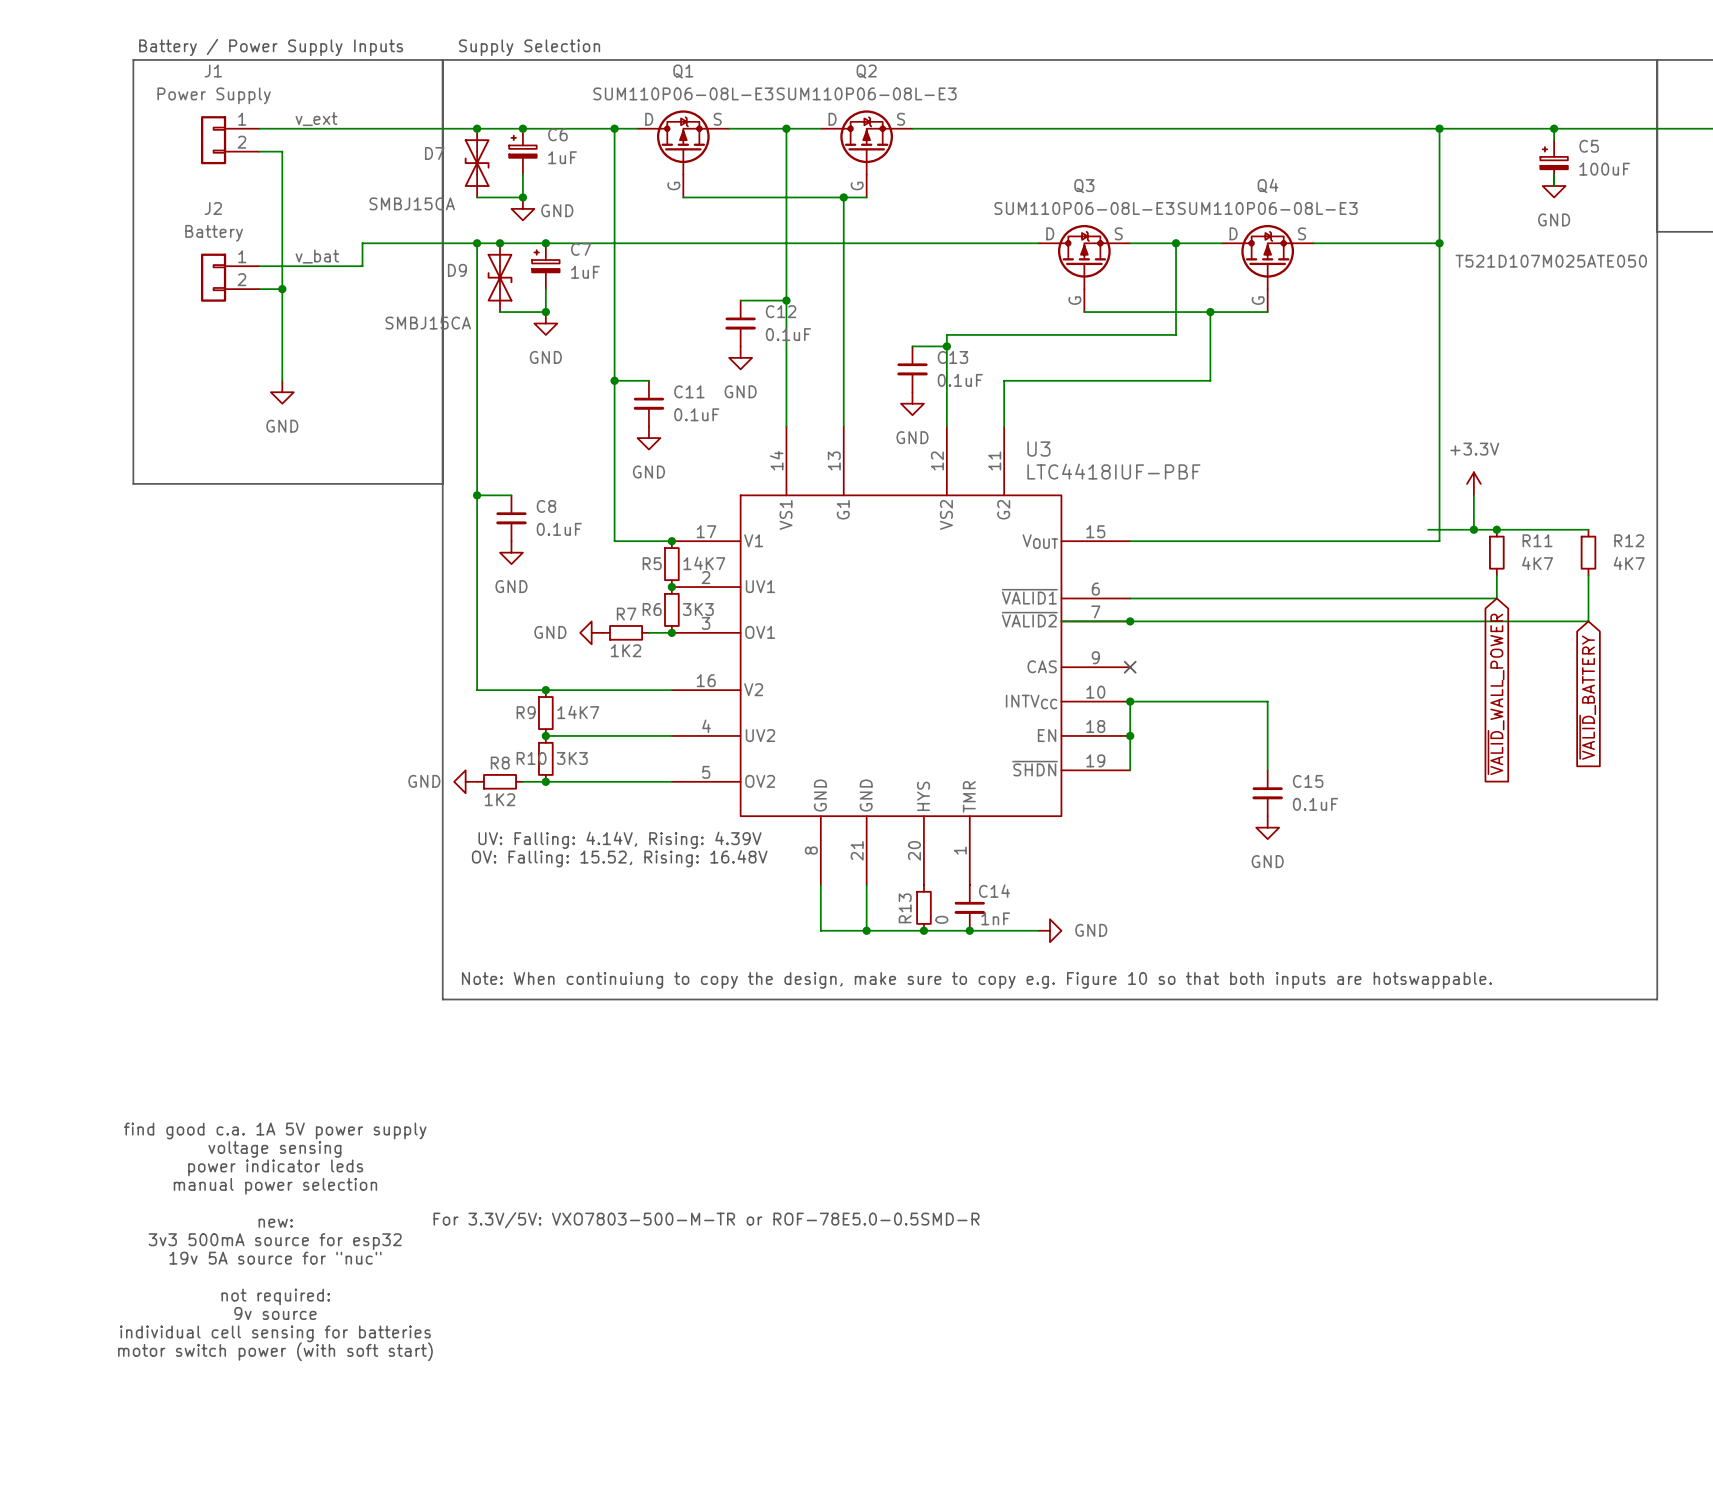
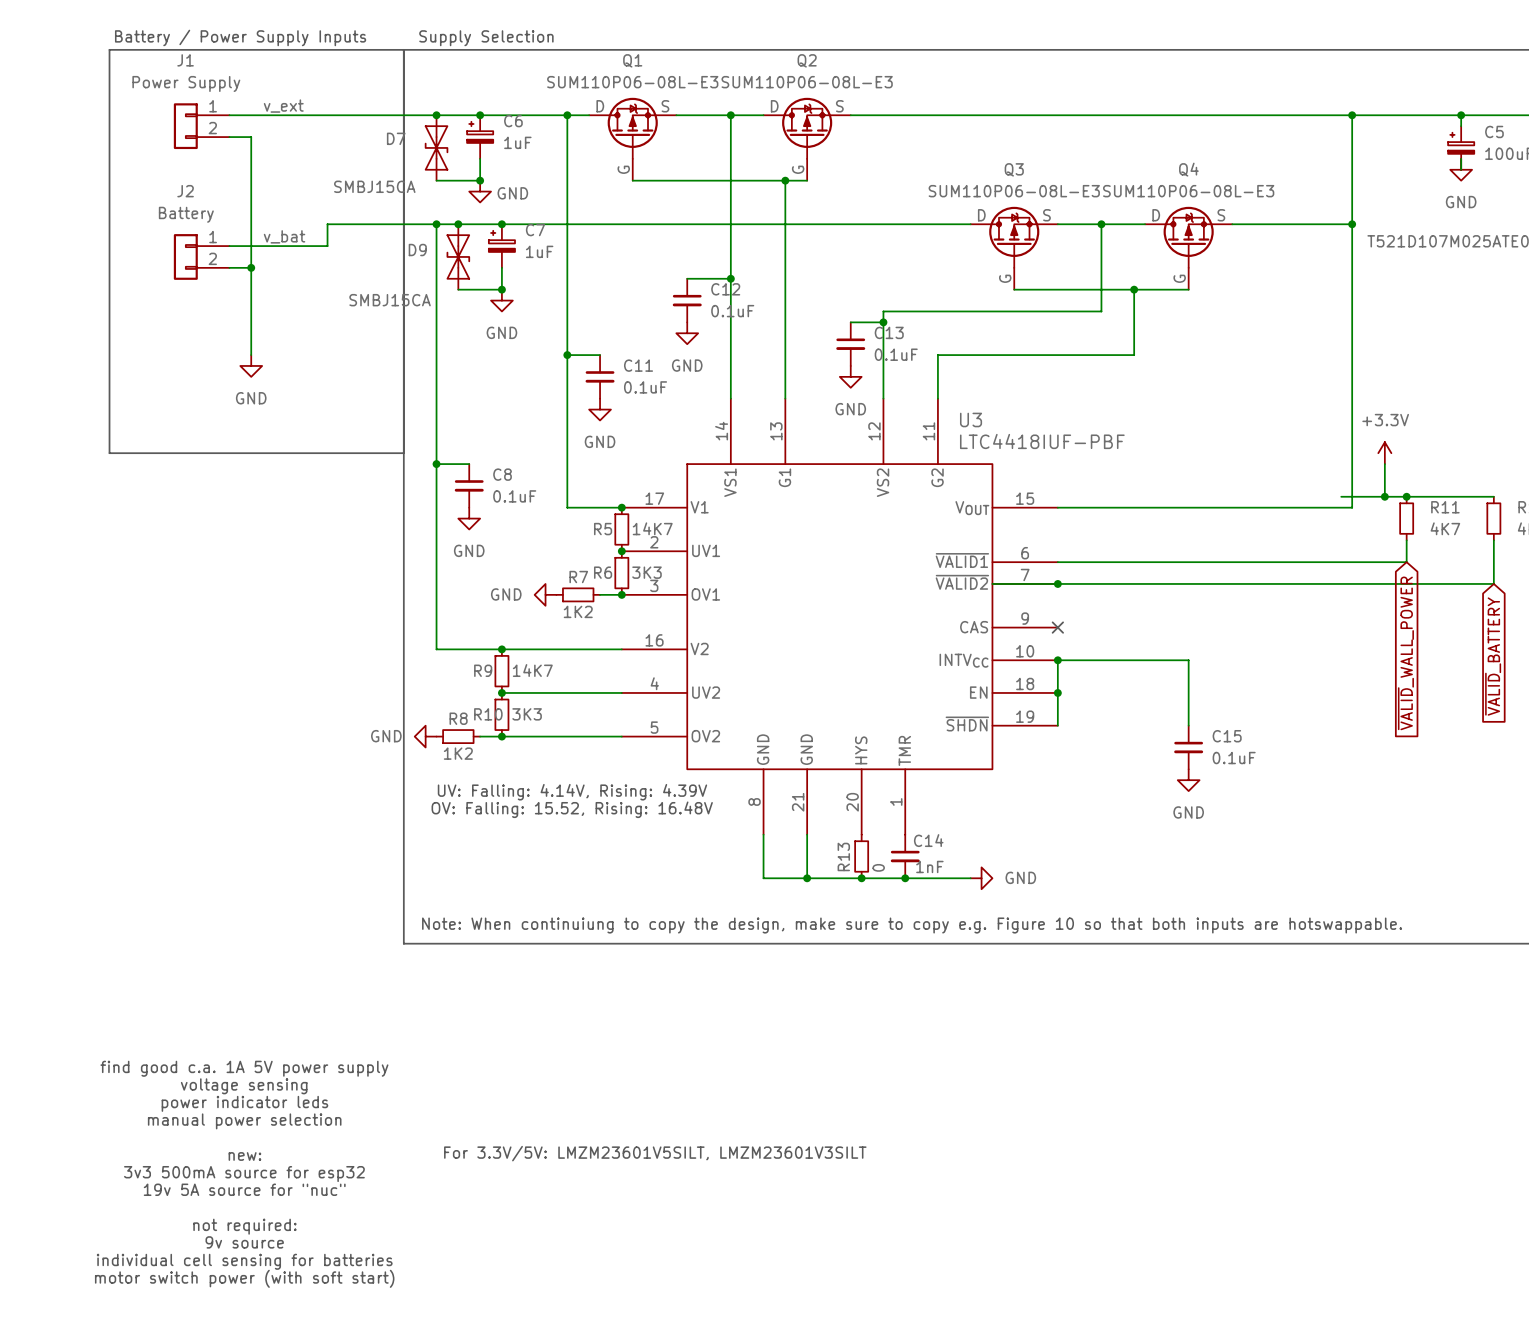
text: For 3.3V/5V: VXO7803-500-M-TR or ROF-78E5.0-0.5SMD-R (706, 1220) -> For 3.3V/5V: LMZM23601V5SILT, LMZM23601V3SILT (655, 1153)

